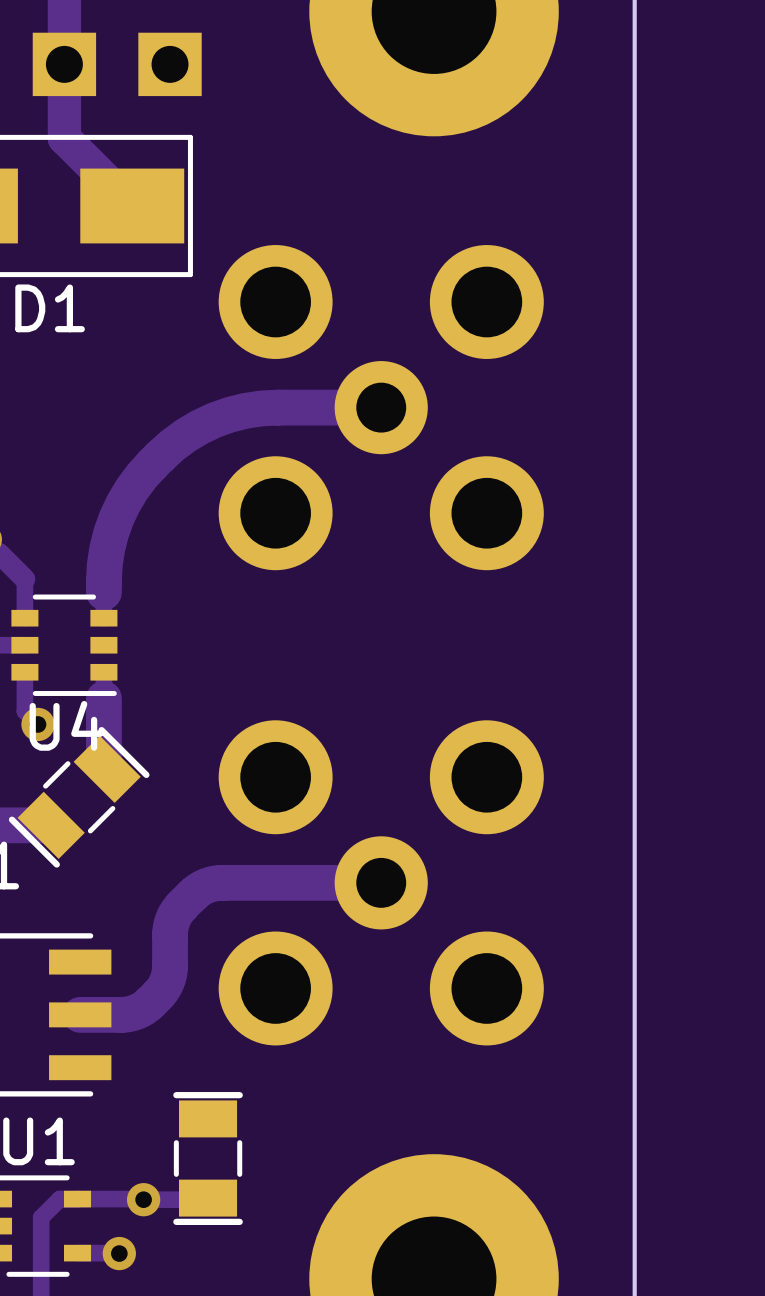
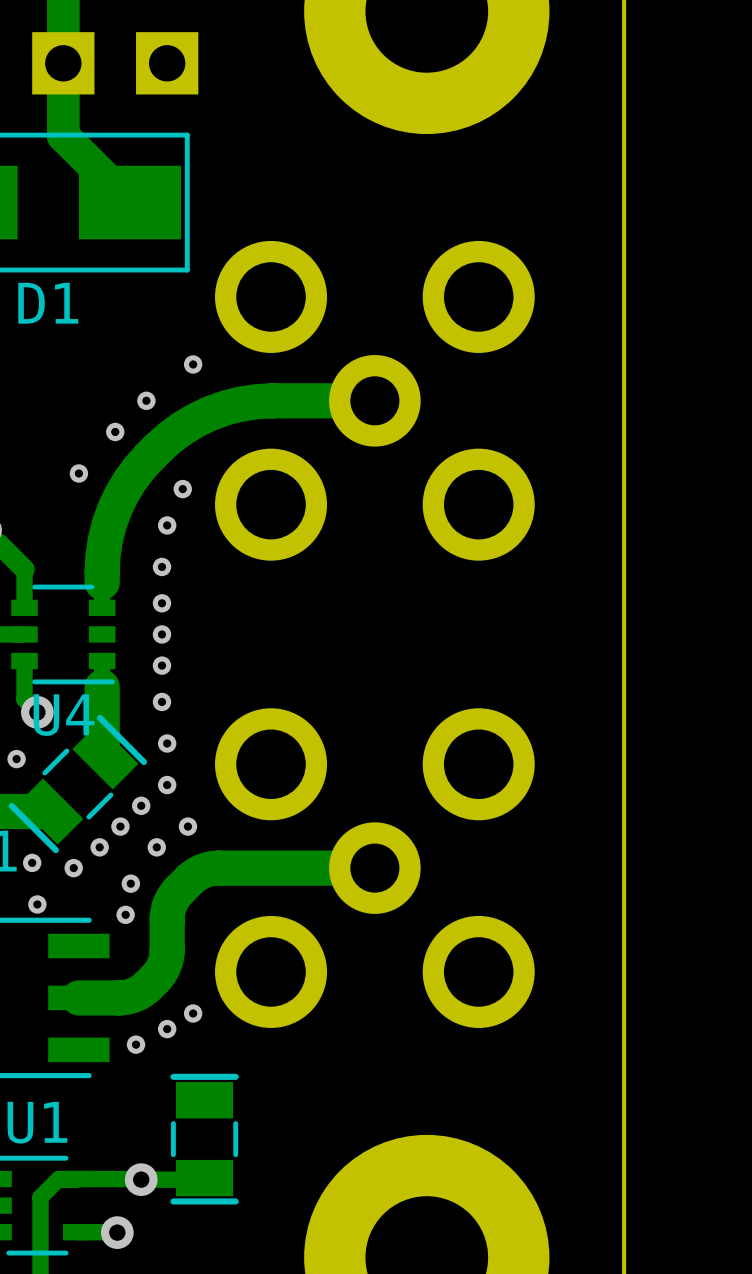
via: none -> (193, 364)
via: none -> (146, 400)
via: none -> (115, 431)
via: none -> (78, 473)
via: none -> (182, 489)
via: none -> (167, 525)
via: none -> (161, 566)
via: none -> (161, 603)
via: none -> (161, 634)
via: none -> (161, 665)
via: none -> (161, 701)
via: none -> (167, 743)
via: none -> (16, 759)
via: none -> (167, 785)
via: none -> (141, 805)
via: none -> (120, 826)
via: none -> (187, 826)
via: none -> (99, 847)
via: none -> (156, 847)
via: none -> (32, 862)
via: none -> (73, 868)
via: none -> (130, 883)
via: none -> (37, 904)
via: none -> (125, 914)
via: none -> (193, 1013)
via: none -> (167, 1029)
via: none -> (136, 1044)

